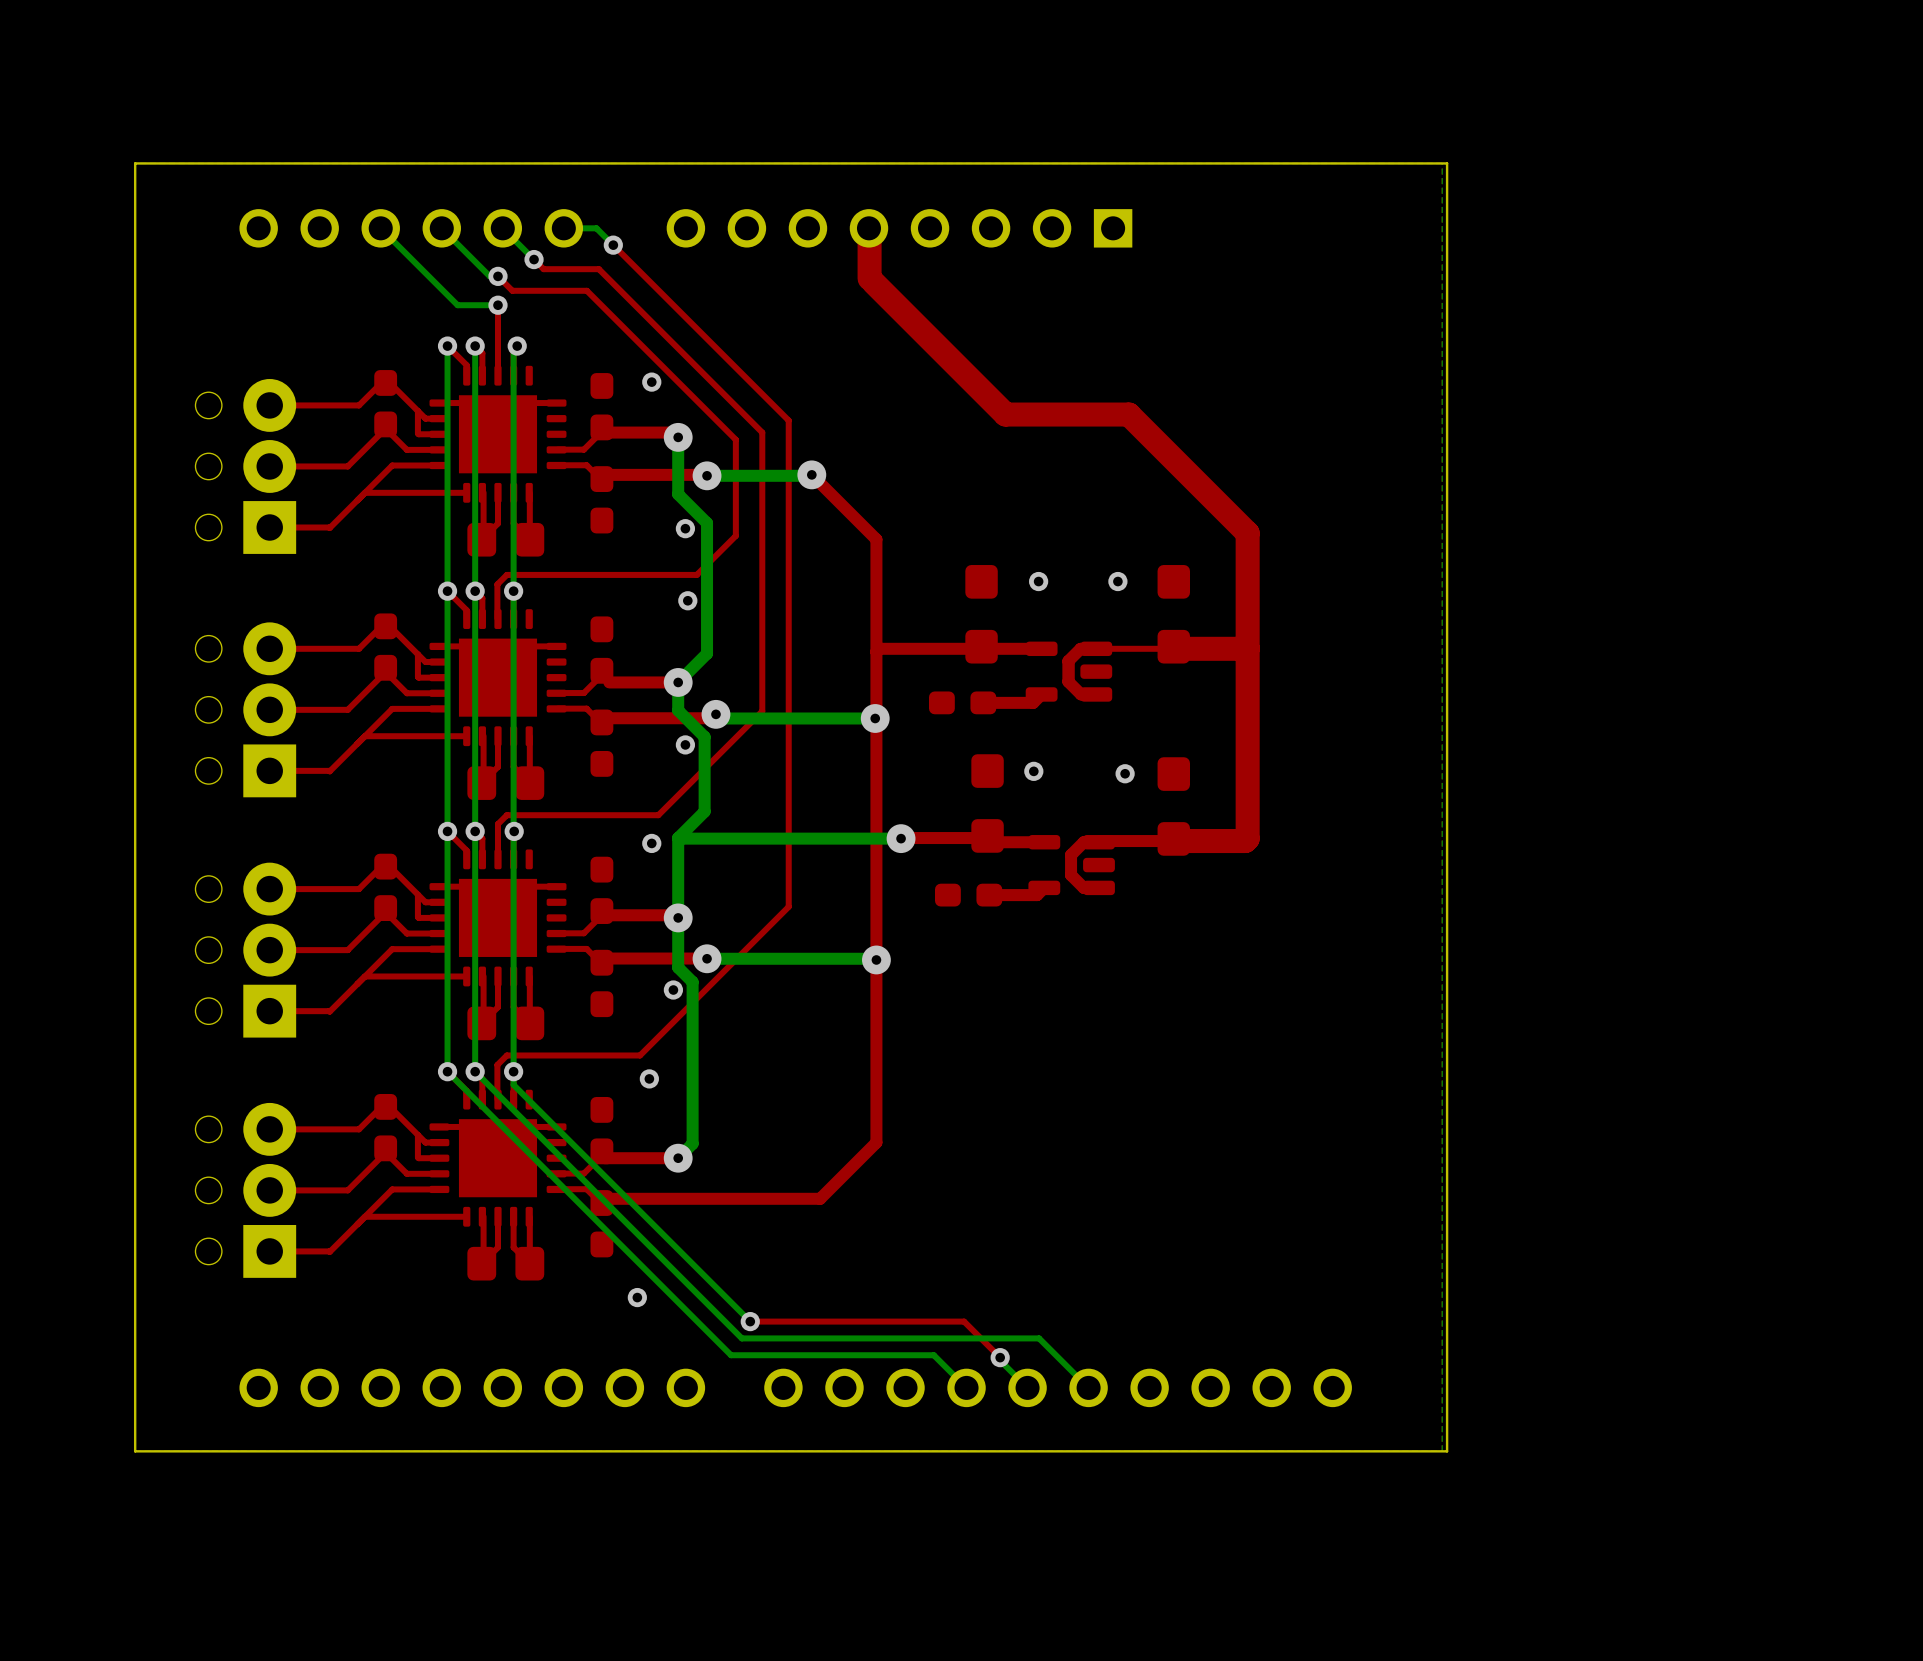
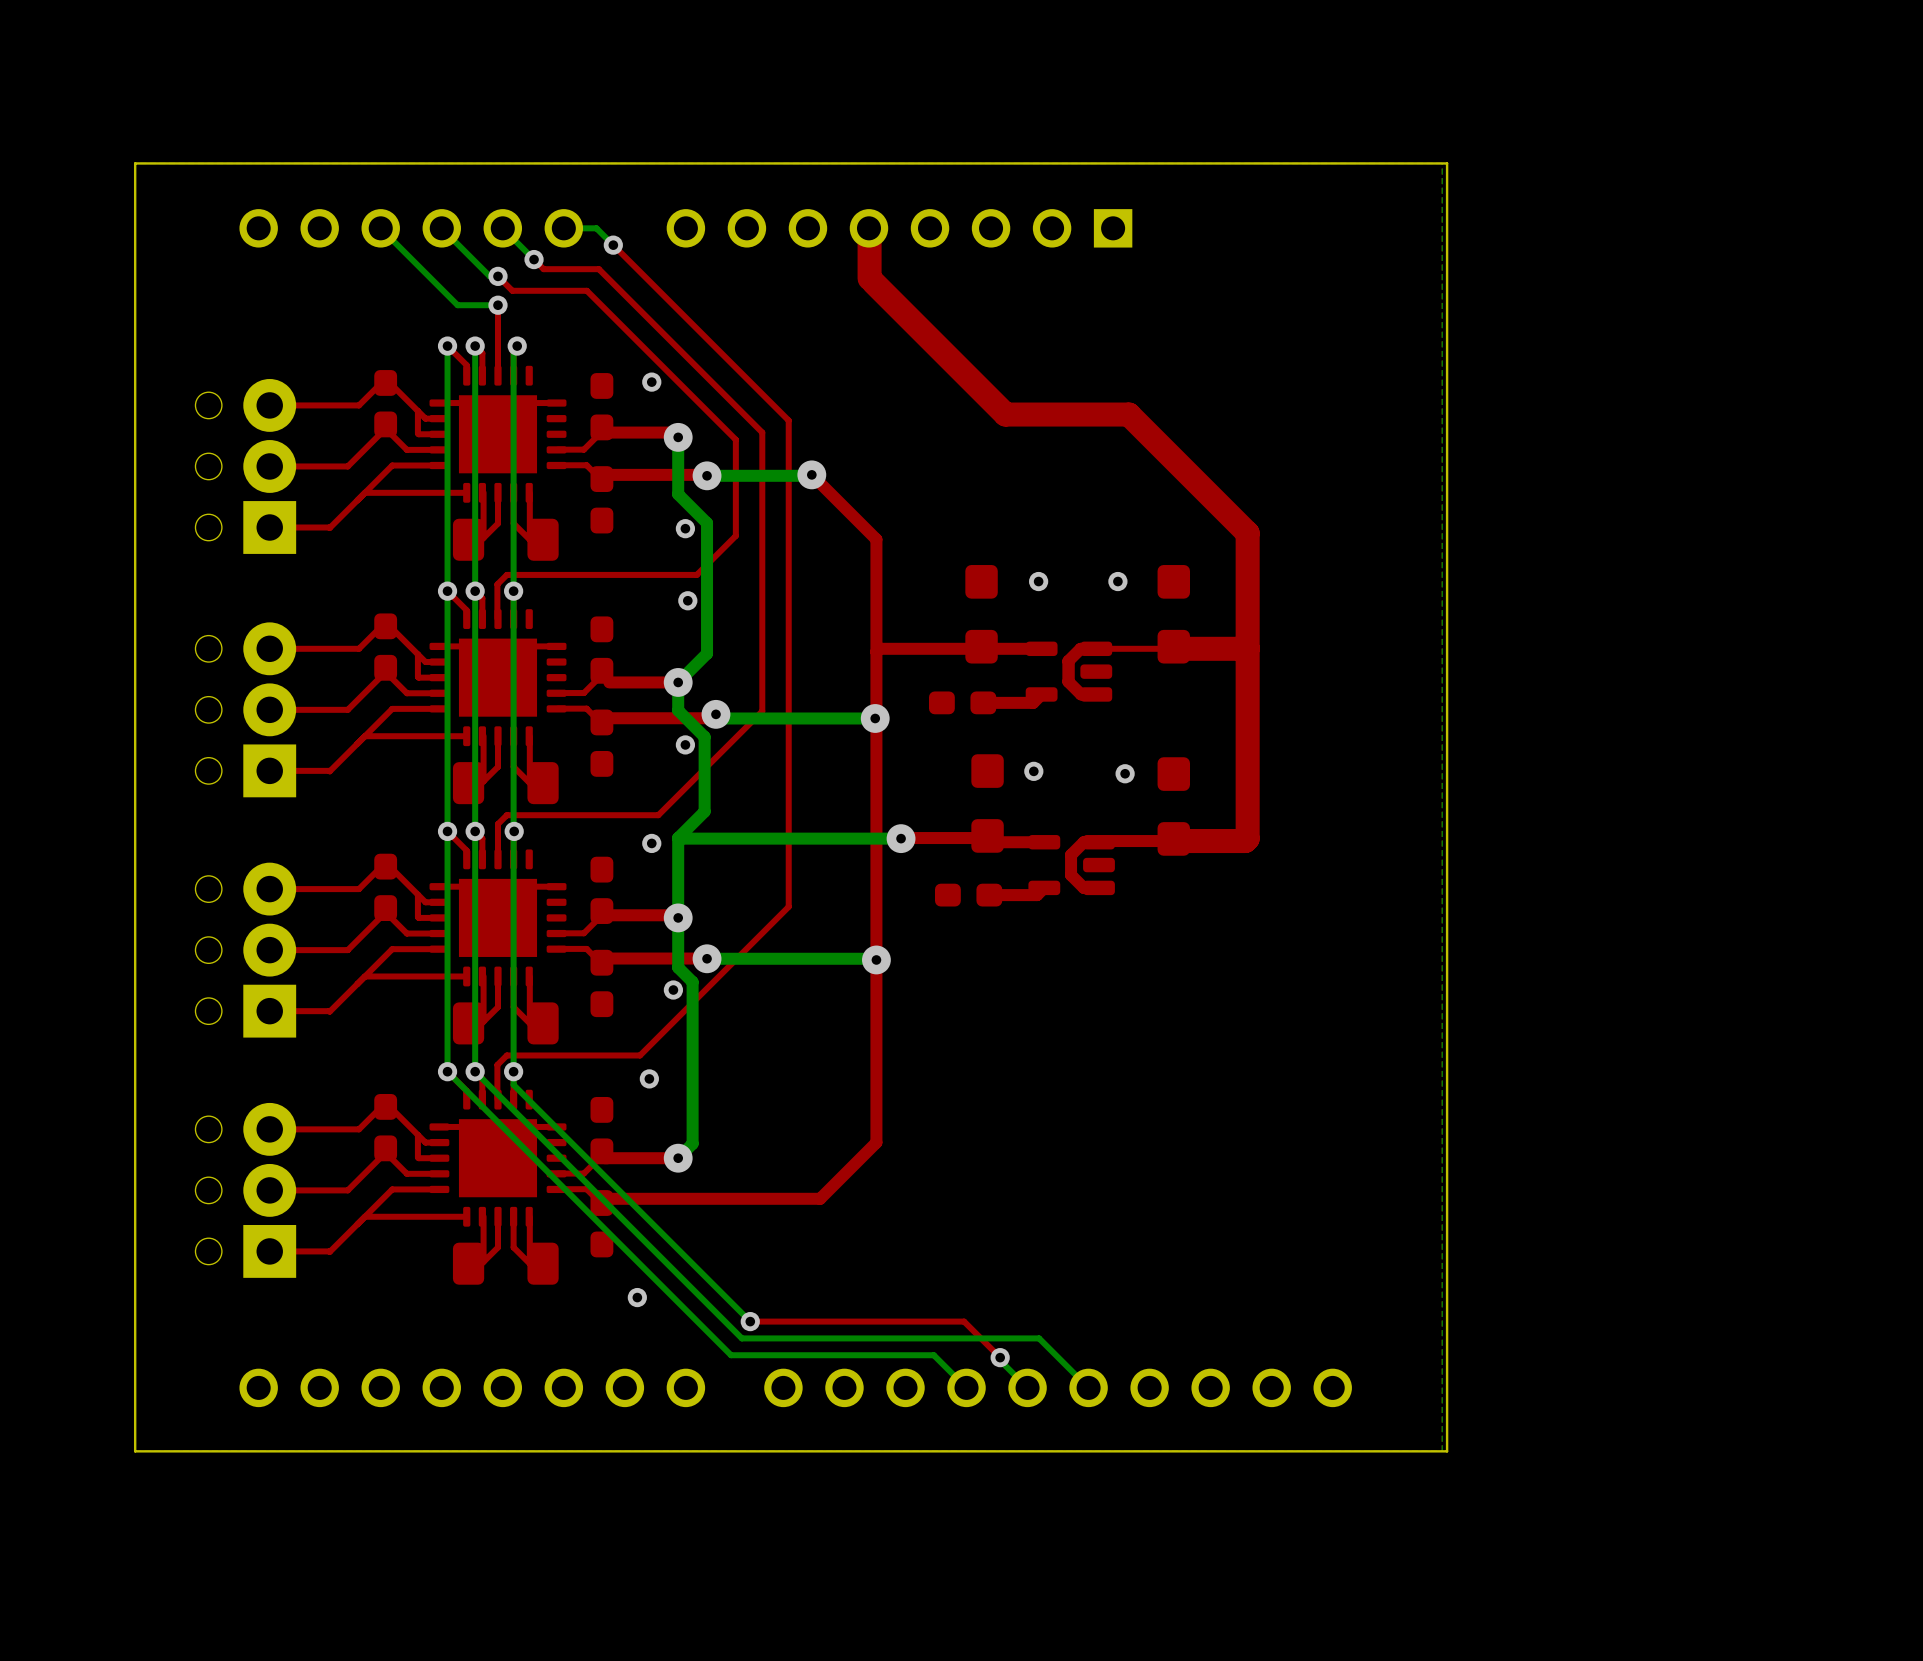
part footprint: [467, 522, 545, 557] -> [452, 518, 559, 561]
part footprint: [467, 766, 545, 800] -> [452, 762, 559, 805]
part footprint: [467, 1006, 545, 1041] -> [452, 1002, 559, 1045]
part footprint: [467, 1246, 545, 1281] -> [452, 1242, 559, 1285]

